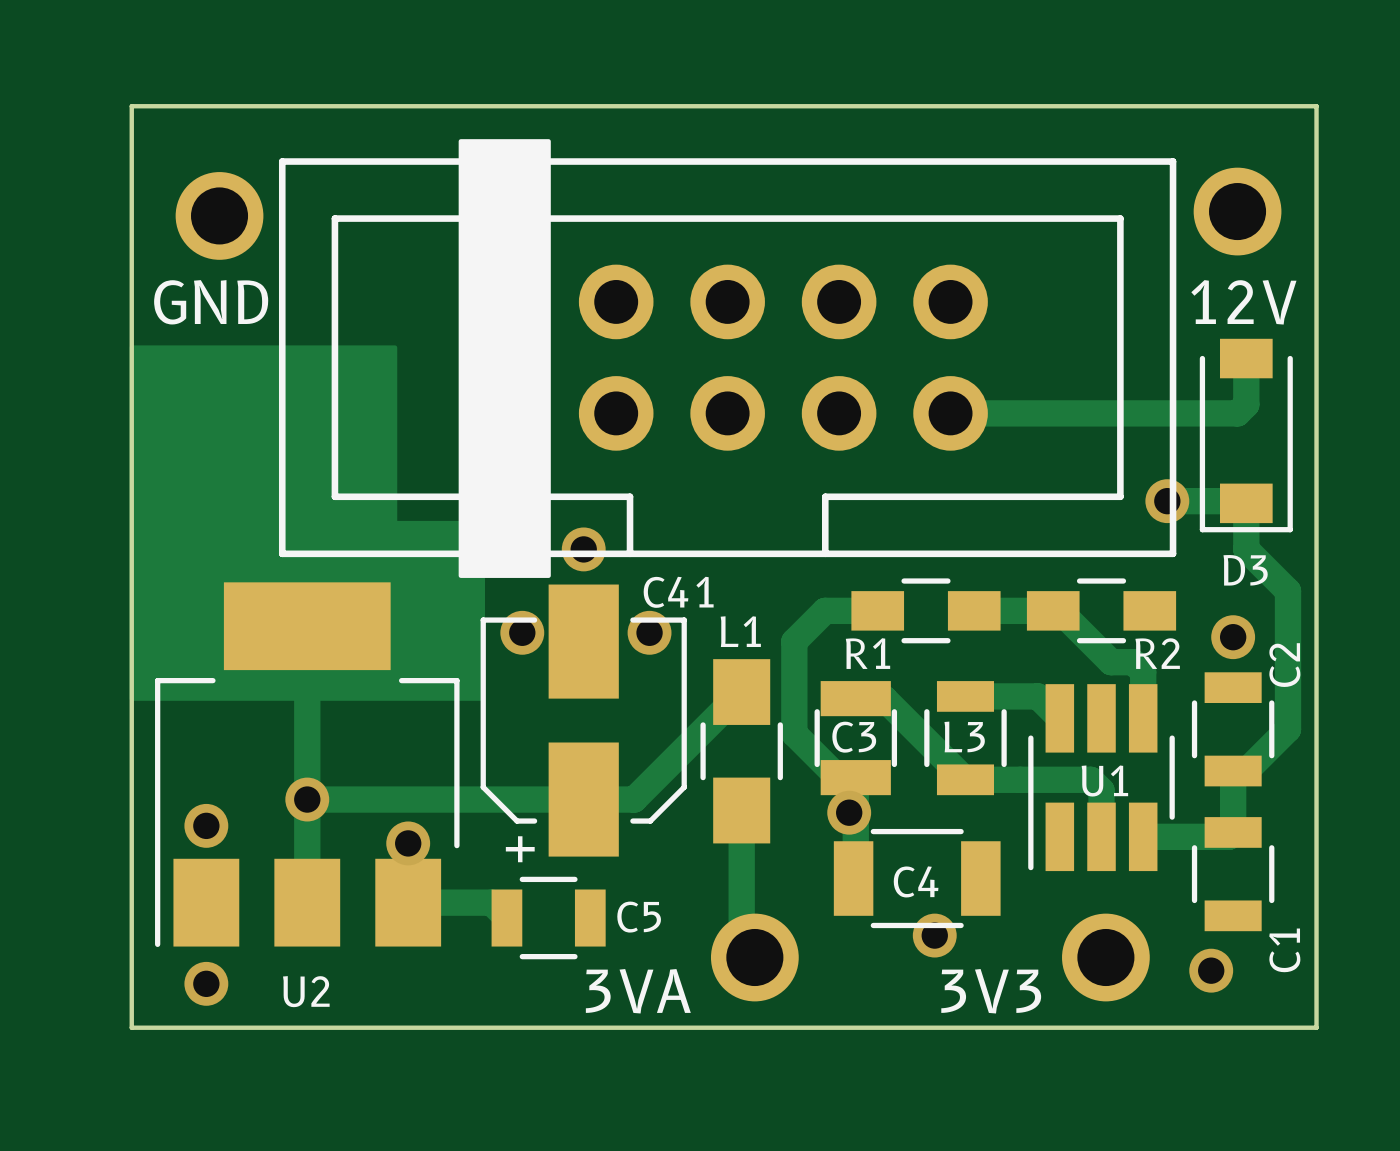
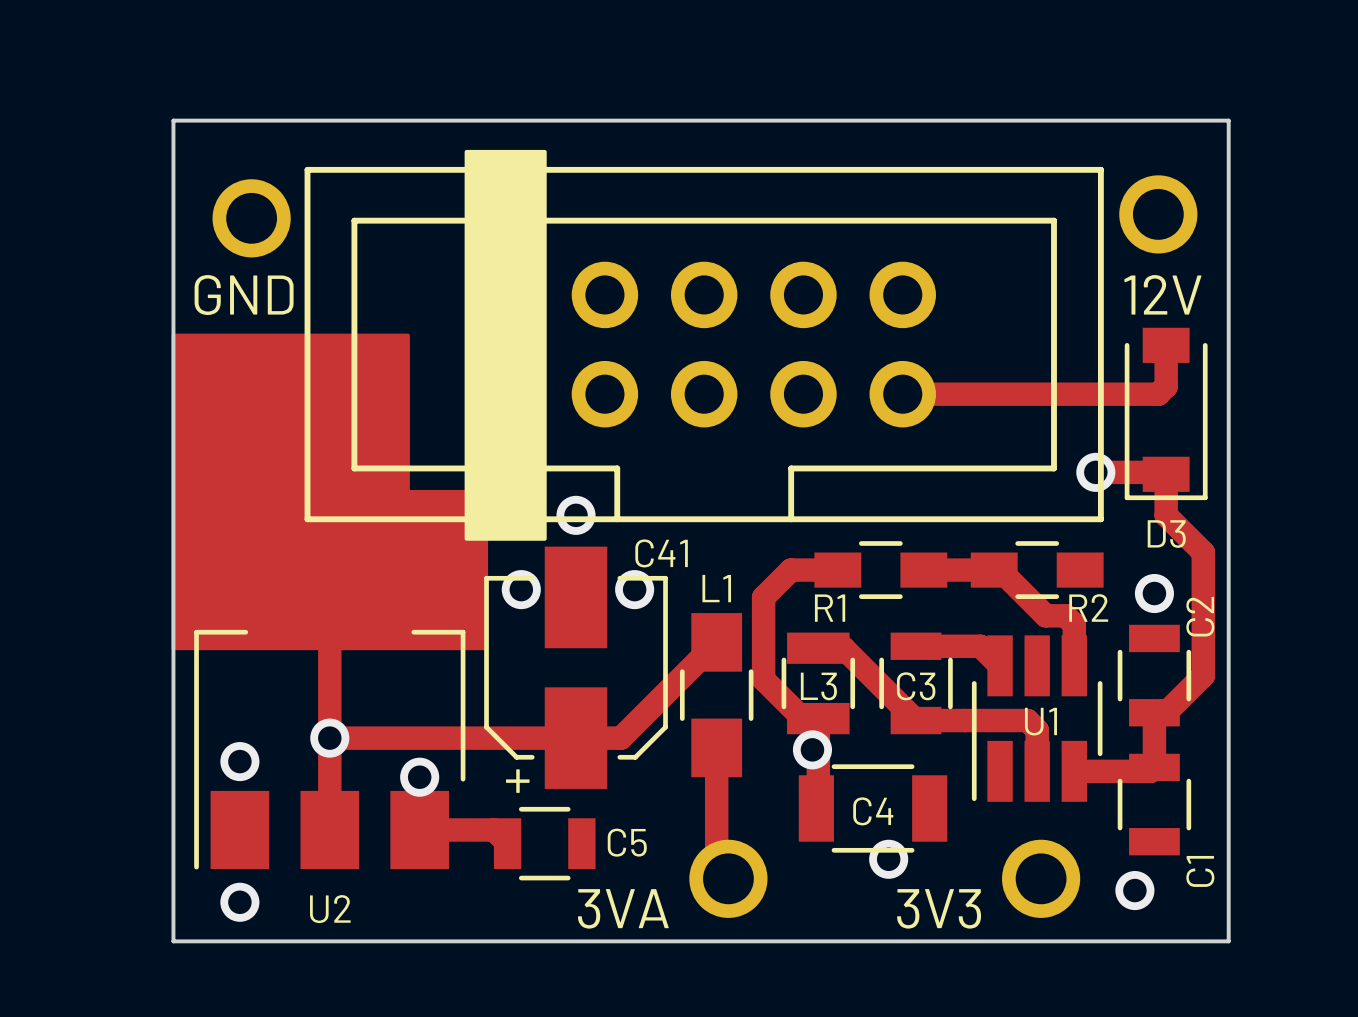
L3 name position: L3 (964, 736) -> L3 (818, 686)
C3 name position: C3 (854, 737) -> C3 (916, 686)

